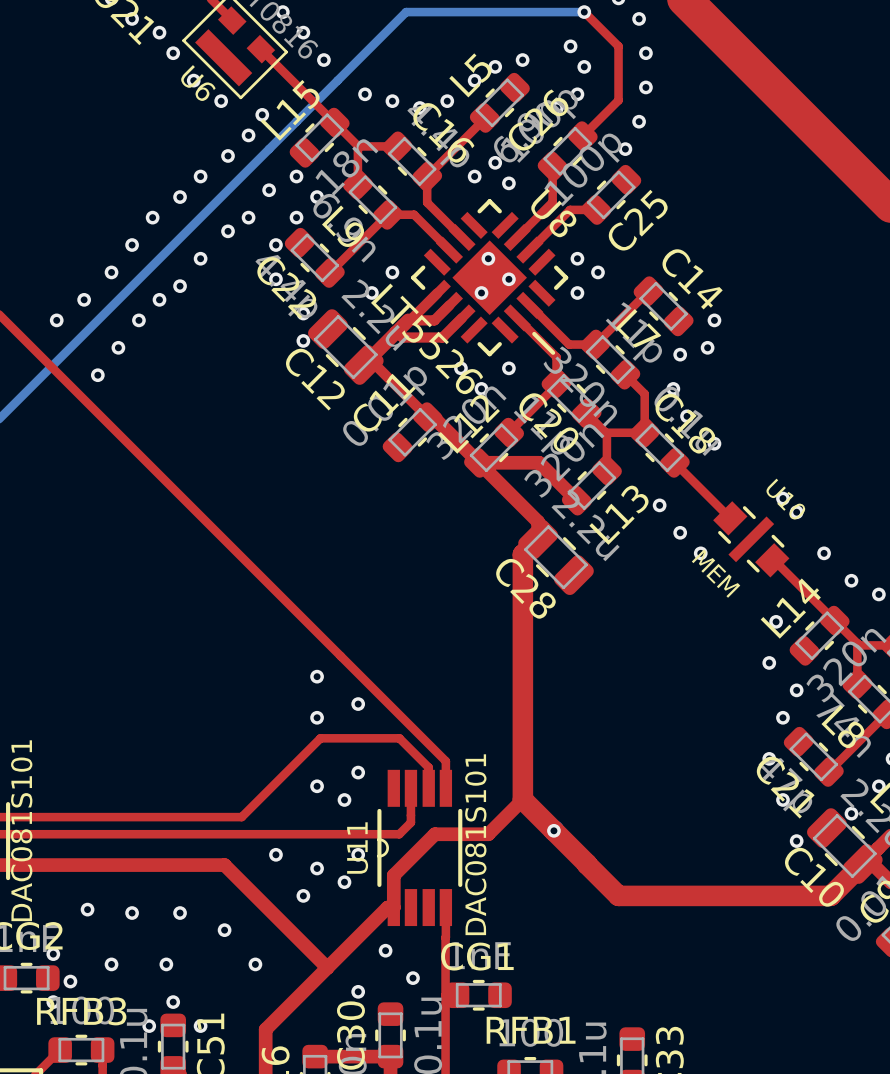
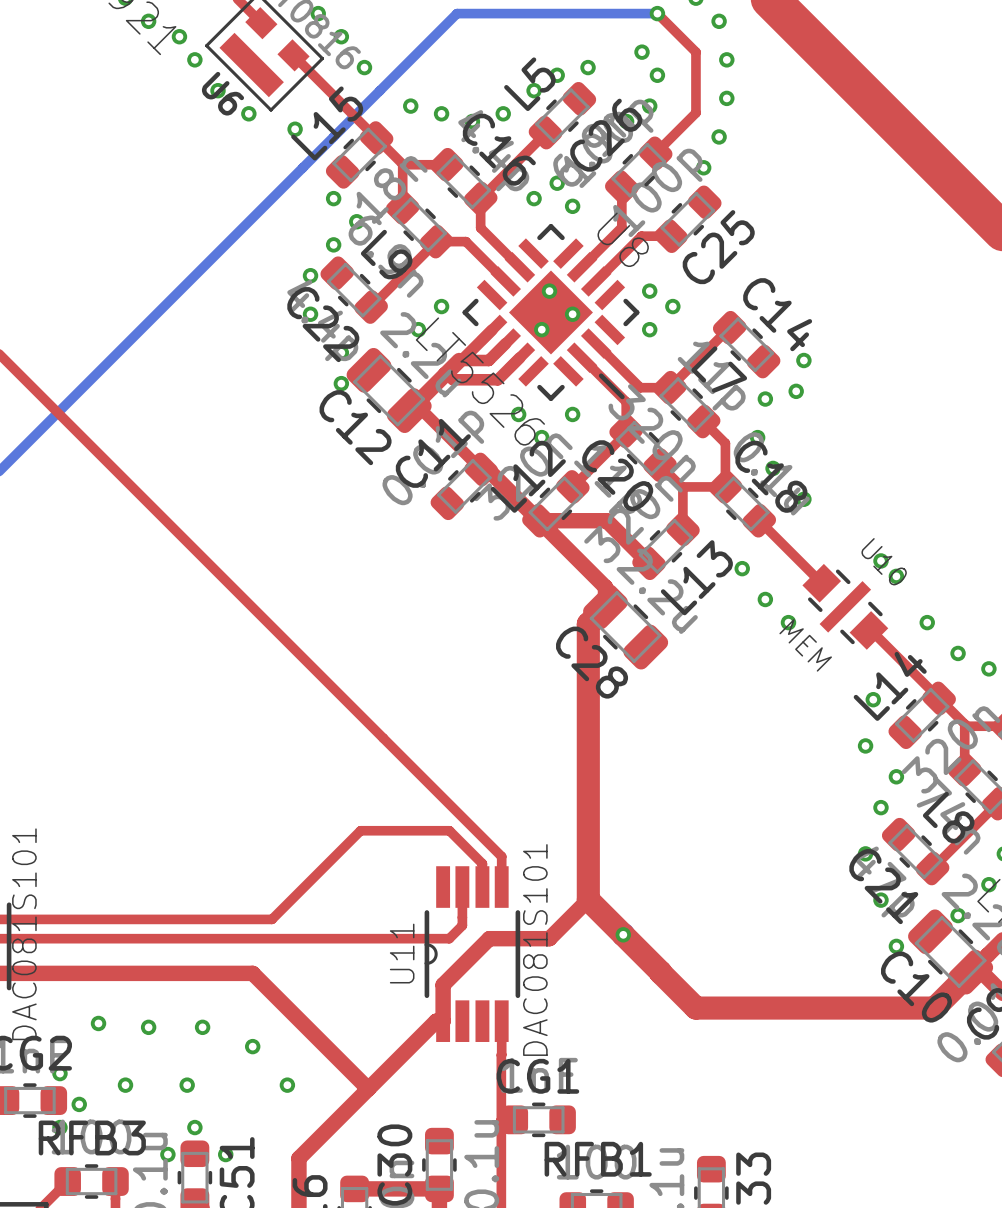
via: (248, 135) -> none
via: (228, 155) -> none
via: (200, 176) -> none
via: (269, 190) -> none
via: (180, 197) -> none
via: (152, 217) -> none
via: (248, 217) -> none
via: (228, 231) -> none
via: (132, 245) -> none
via: (200, 258) -> none
via: (111, 272) -> none
via: (180, 286) -> none
via: (84, 299) -> none
via: (159, 299) -> none
via: (56, 320) -> none
via: (138, 320) -> none
via: (118, 347) -> none
via: (97, 375) -> none
via: (317, 676) -> none
via: (358, 704) -> none
via: (317, 717) -> none
via: (358, 772) -> none
via: (317, 786) -> none
via: (344, 799) -> none
via: (275, 854) -> none
via: (358, 854) -> none
via: (317, 868) -> none
via: (344, 882) -> none
via: (303, 895) -> none
via: (385, 950) -> none
via: (412, 978) -> none
via: (358, 991) -> none

